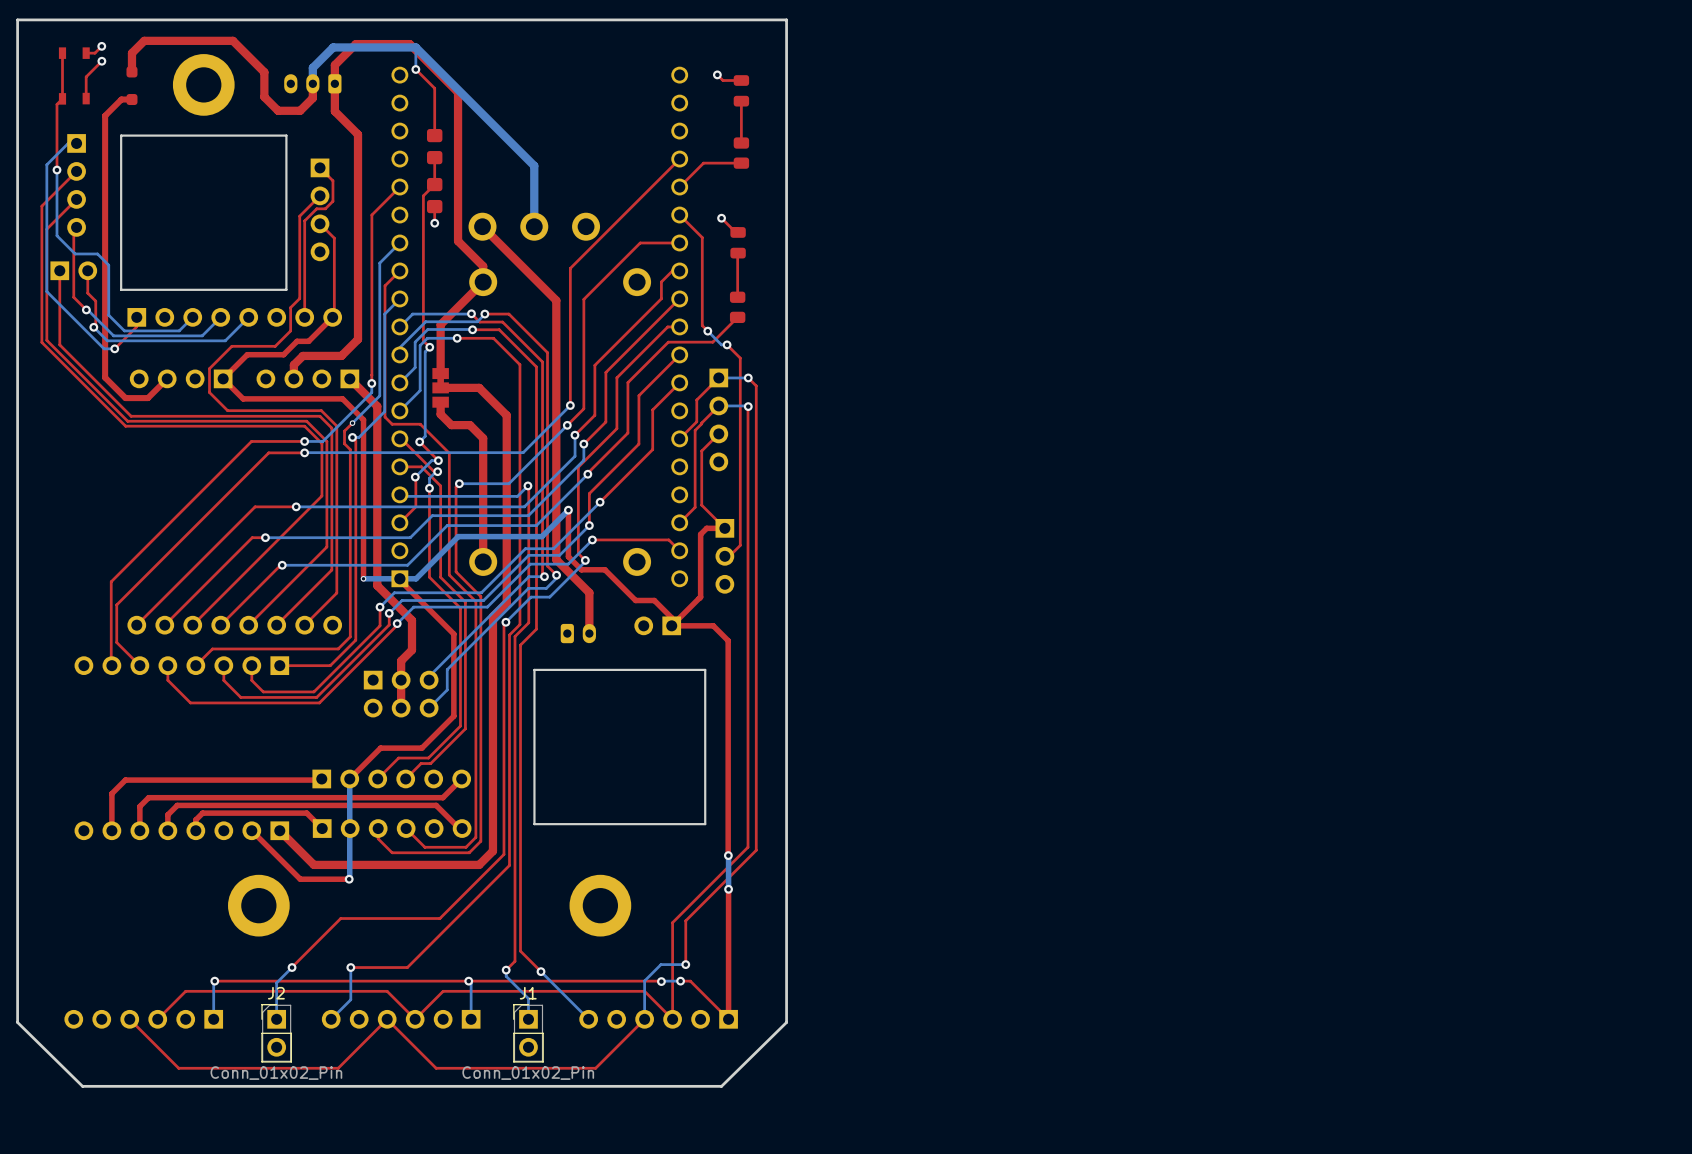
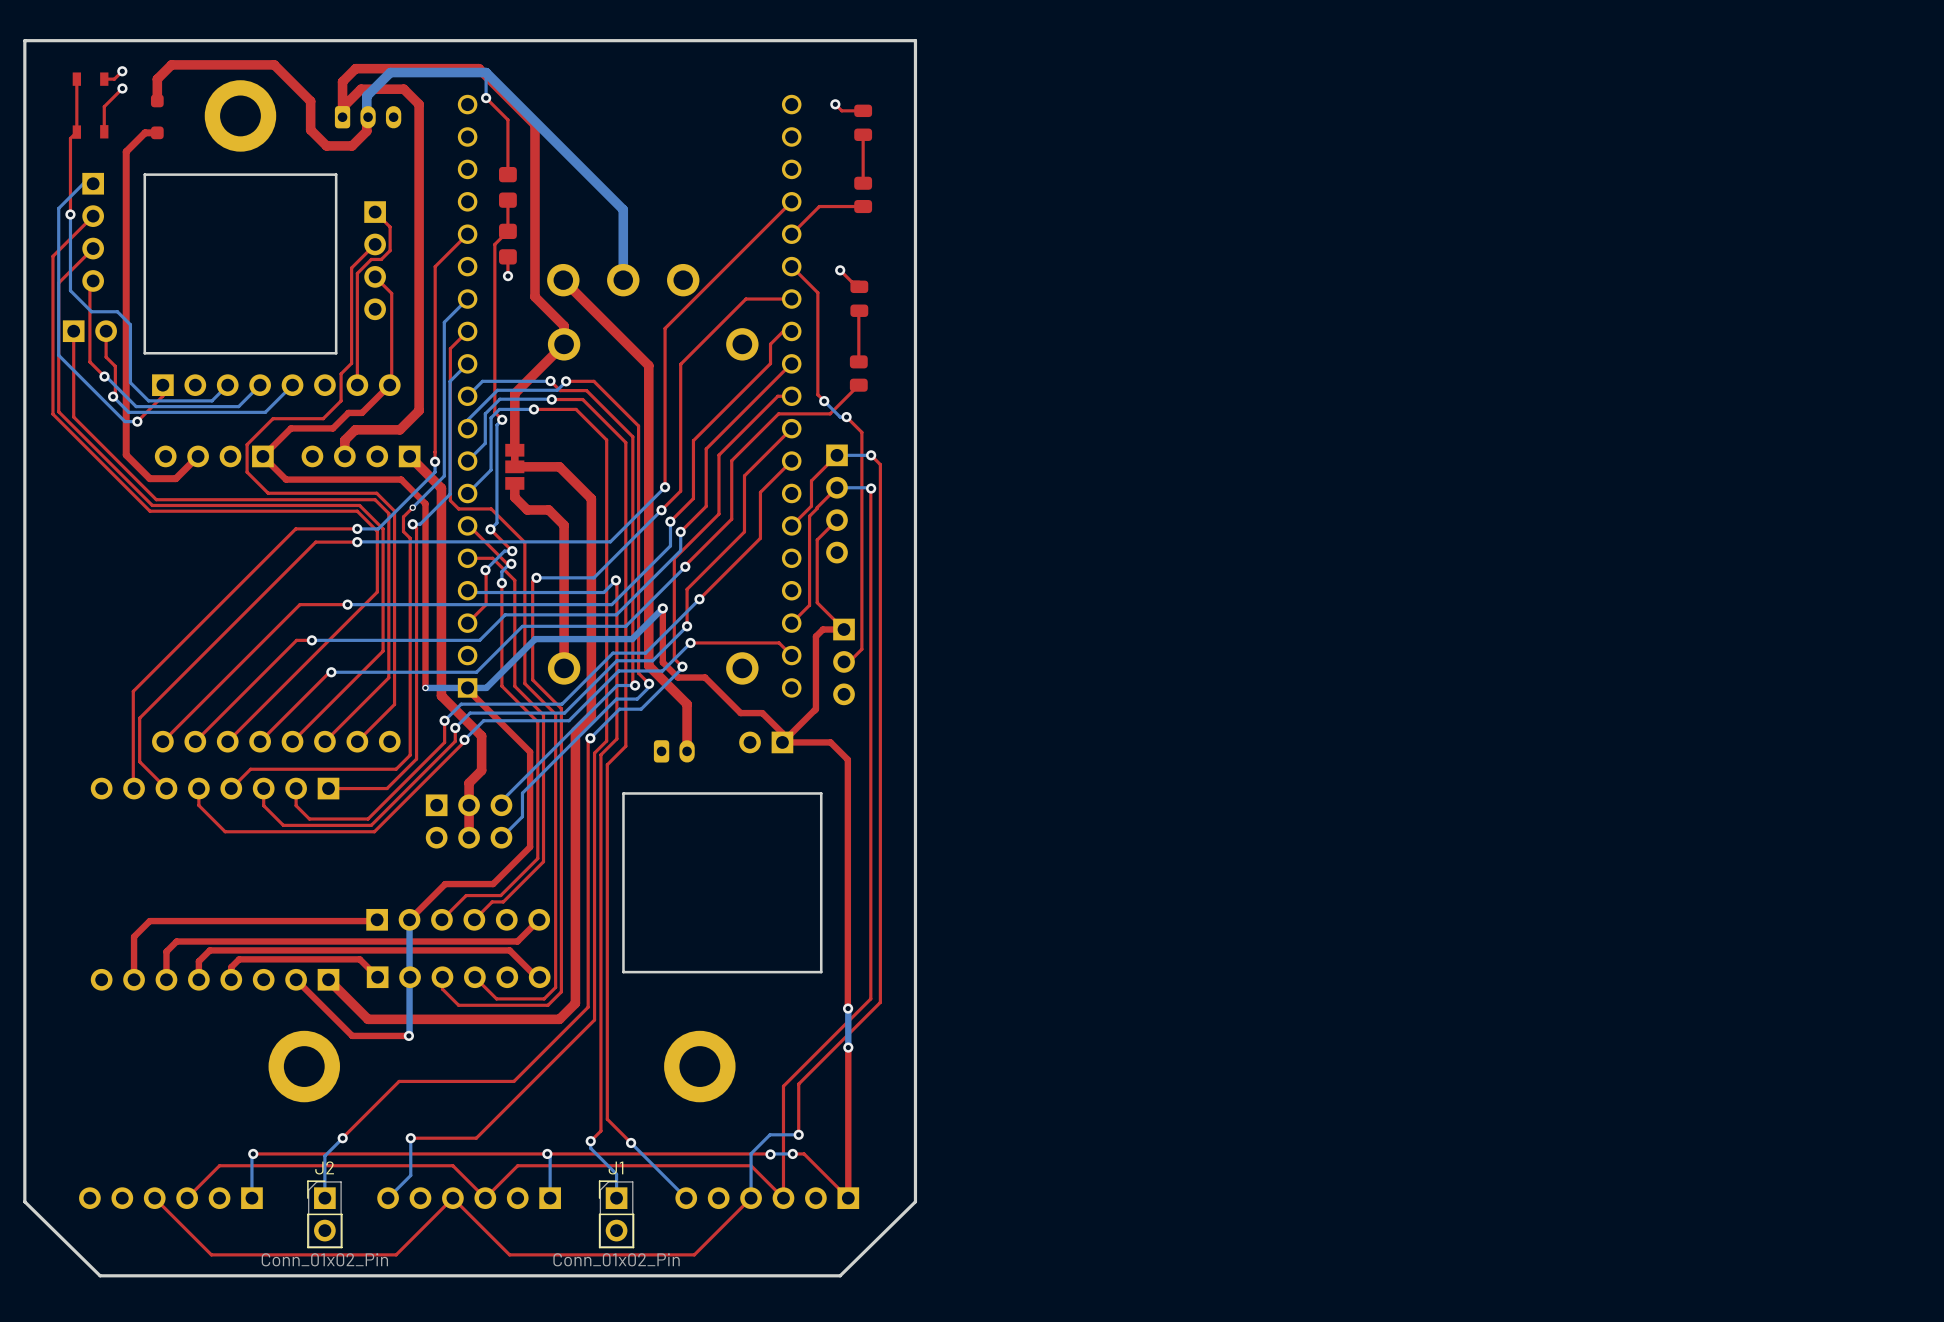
top track: (355, 44) (334, 65) (334, 111) (358, 134) -> (342, 107) (361, 89) (403, 89) (419, 104) (419, 173)
top track: none -> (416, 68) (355, 68) (342, 81) (342, 117)
part rotation: 0° (312, 83) -> 180° (368, 117)

